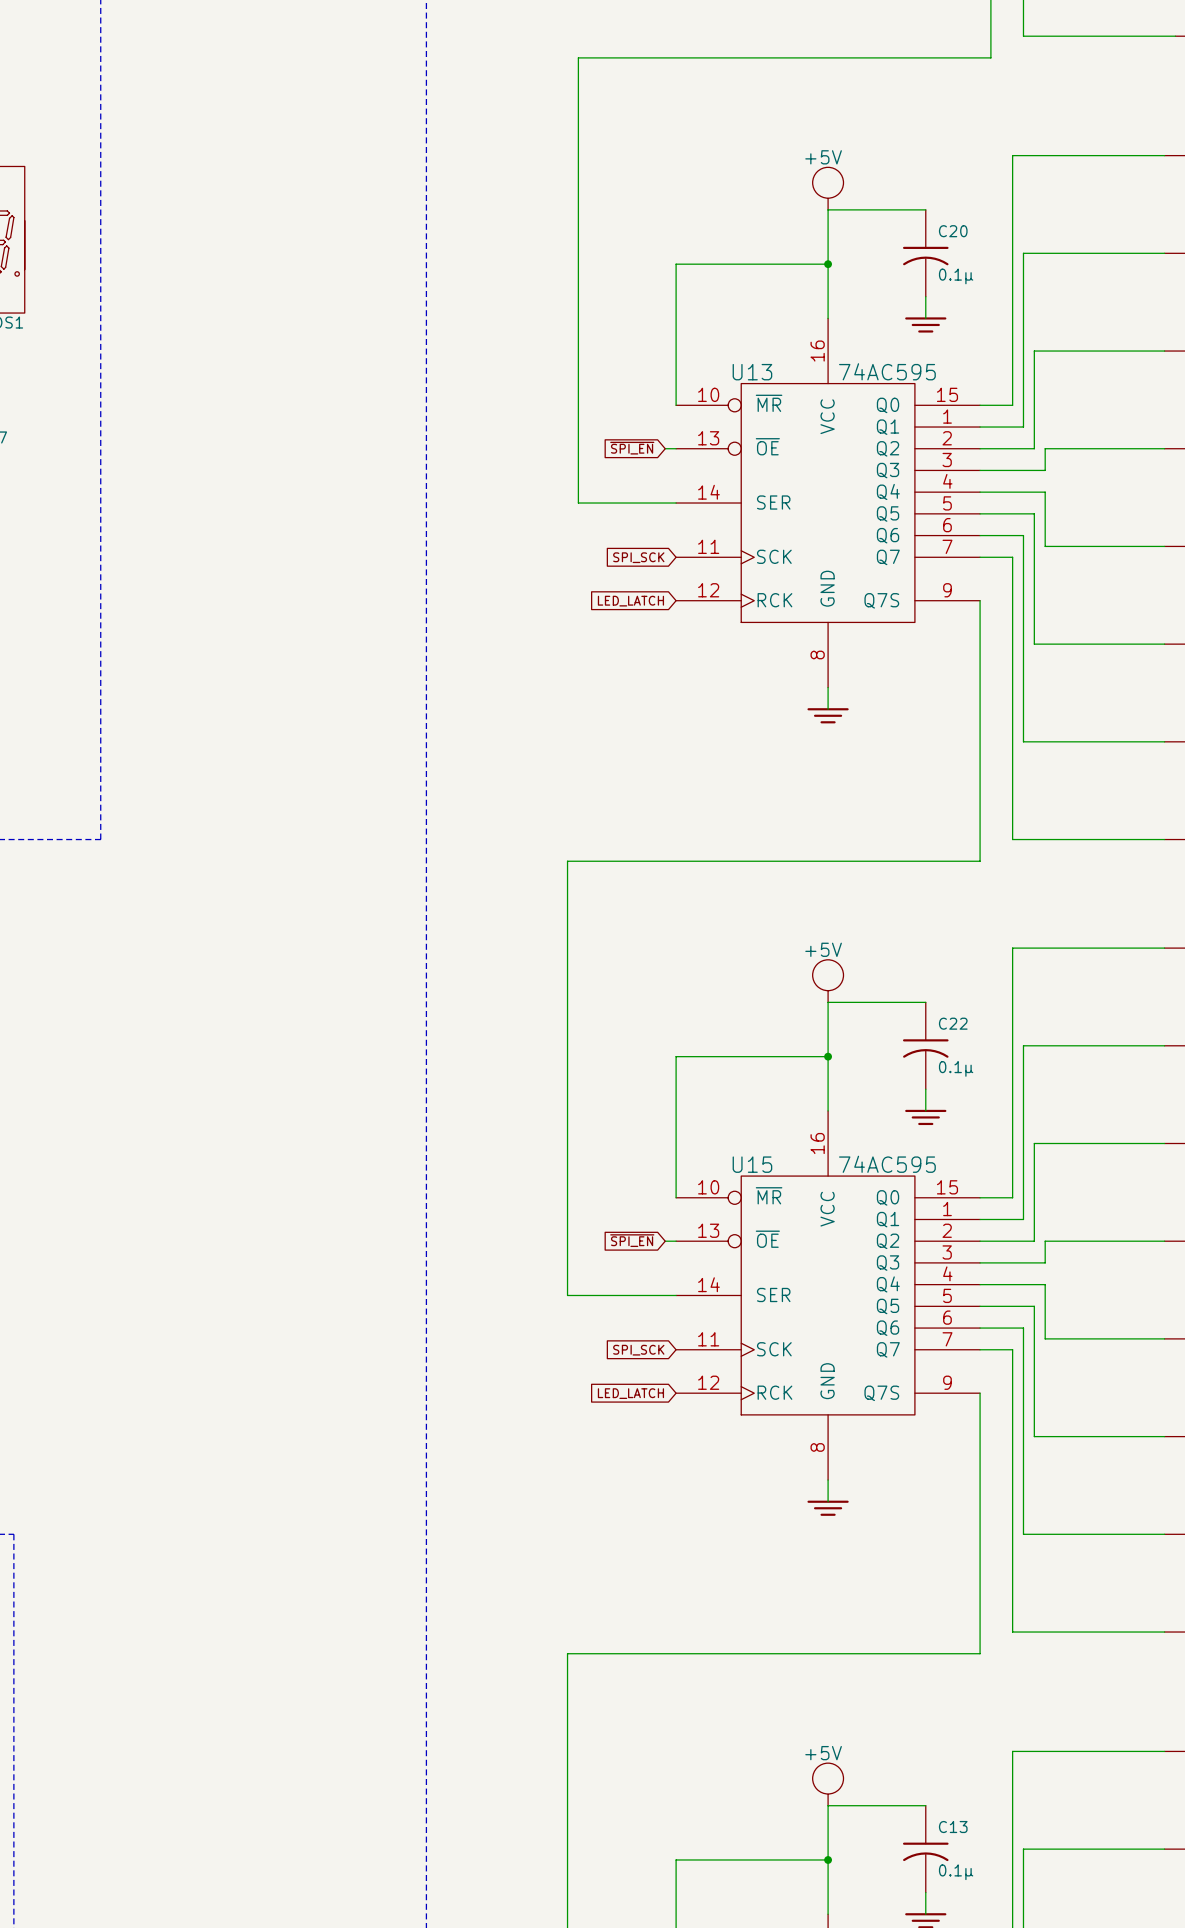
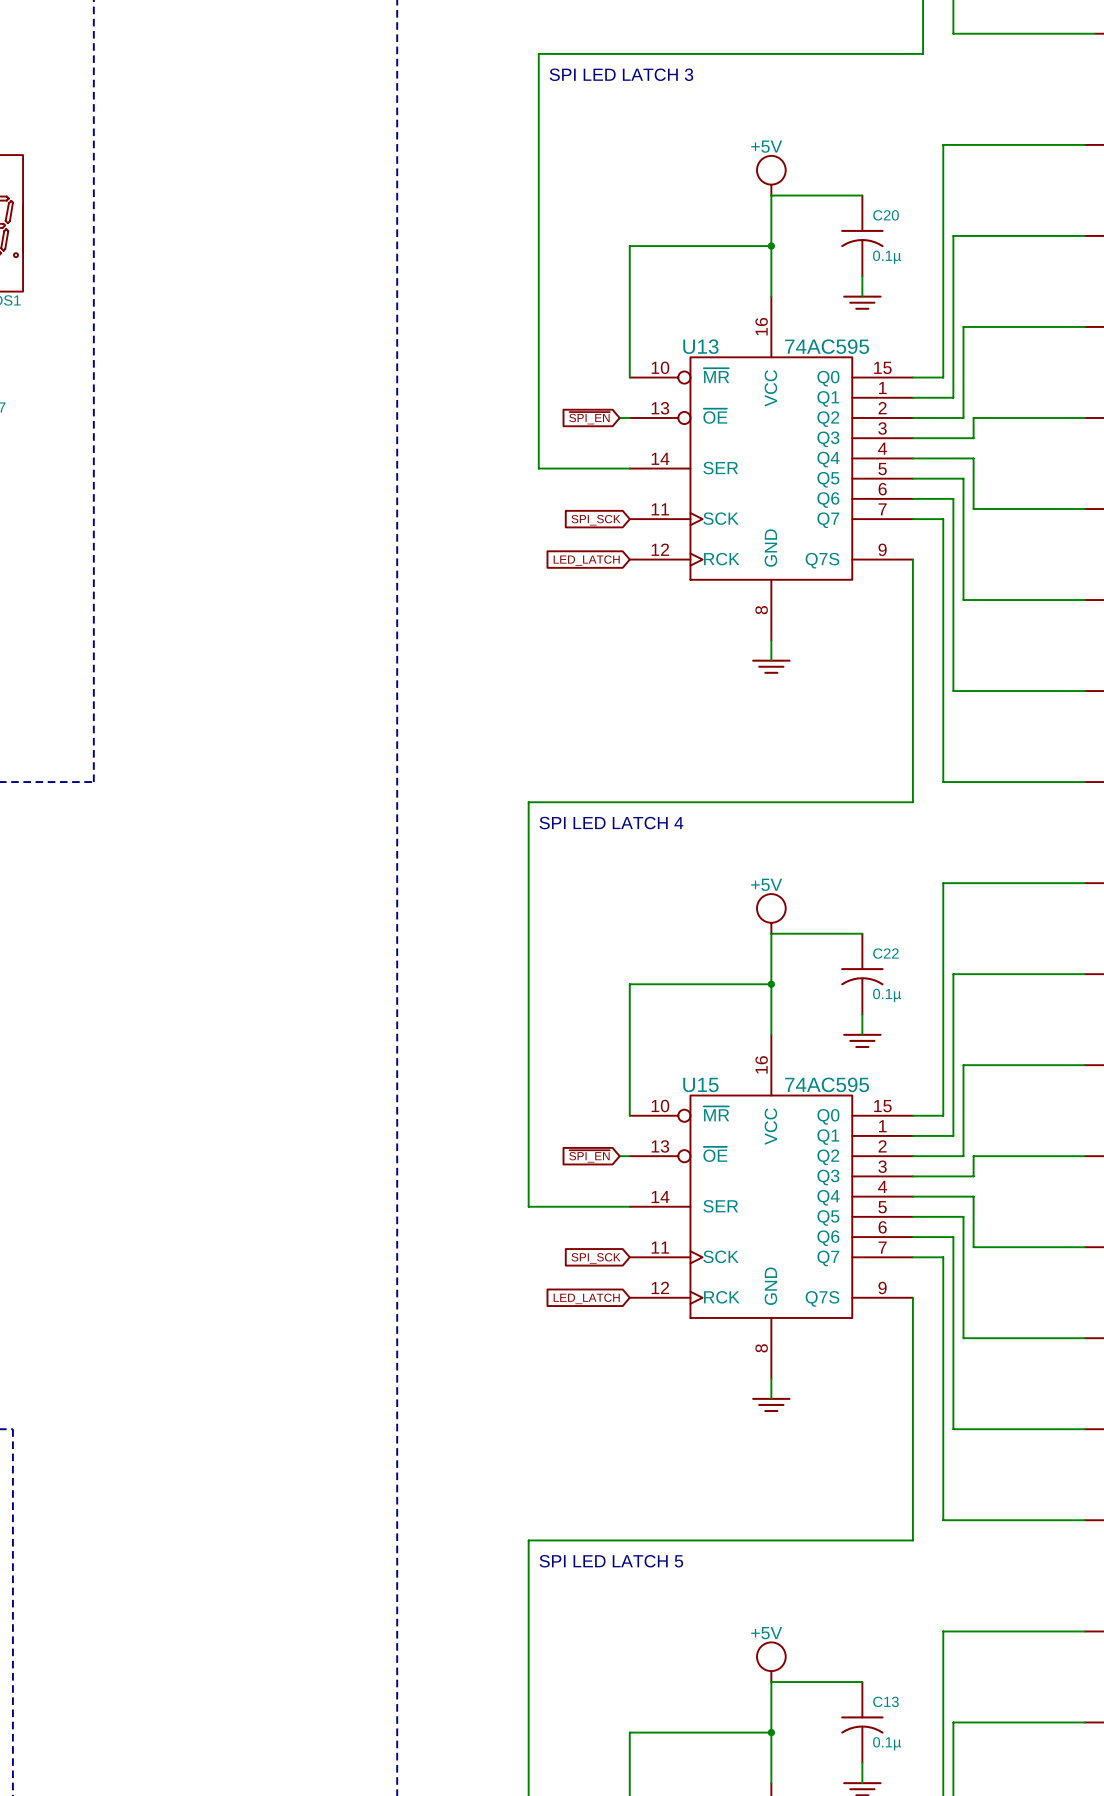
text: none -> SPI LED LATCH 3 (621, 74)
text: none -> SPI LED LATCH 4 (611, 823)
text: none -> SPI LED LATCH 5 (611, 1561)

